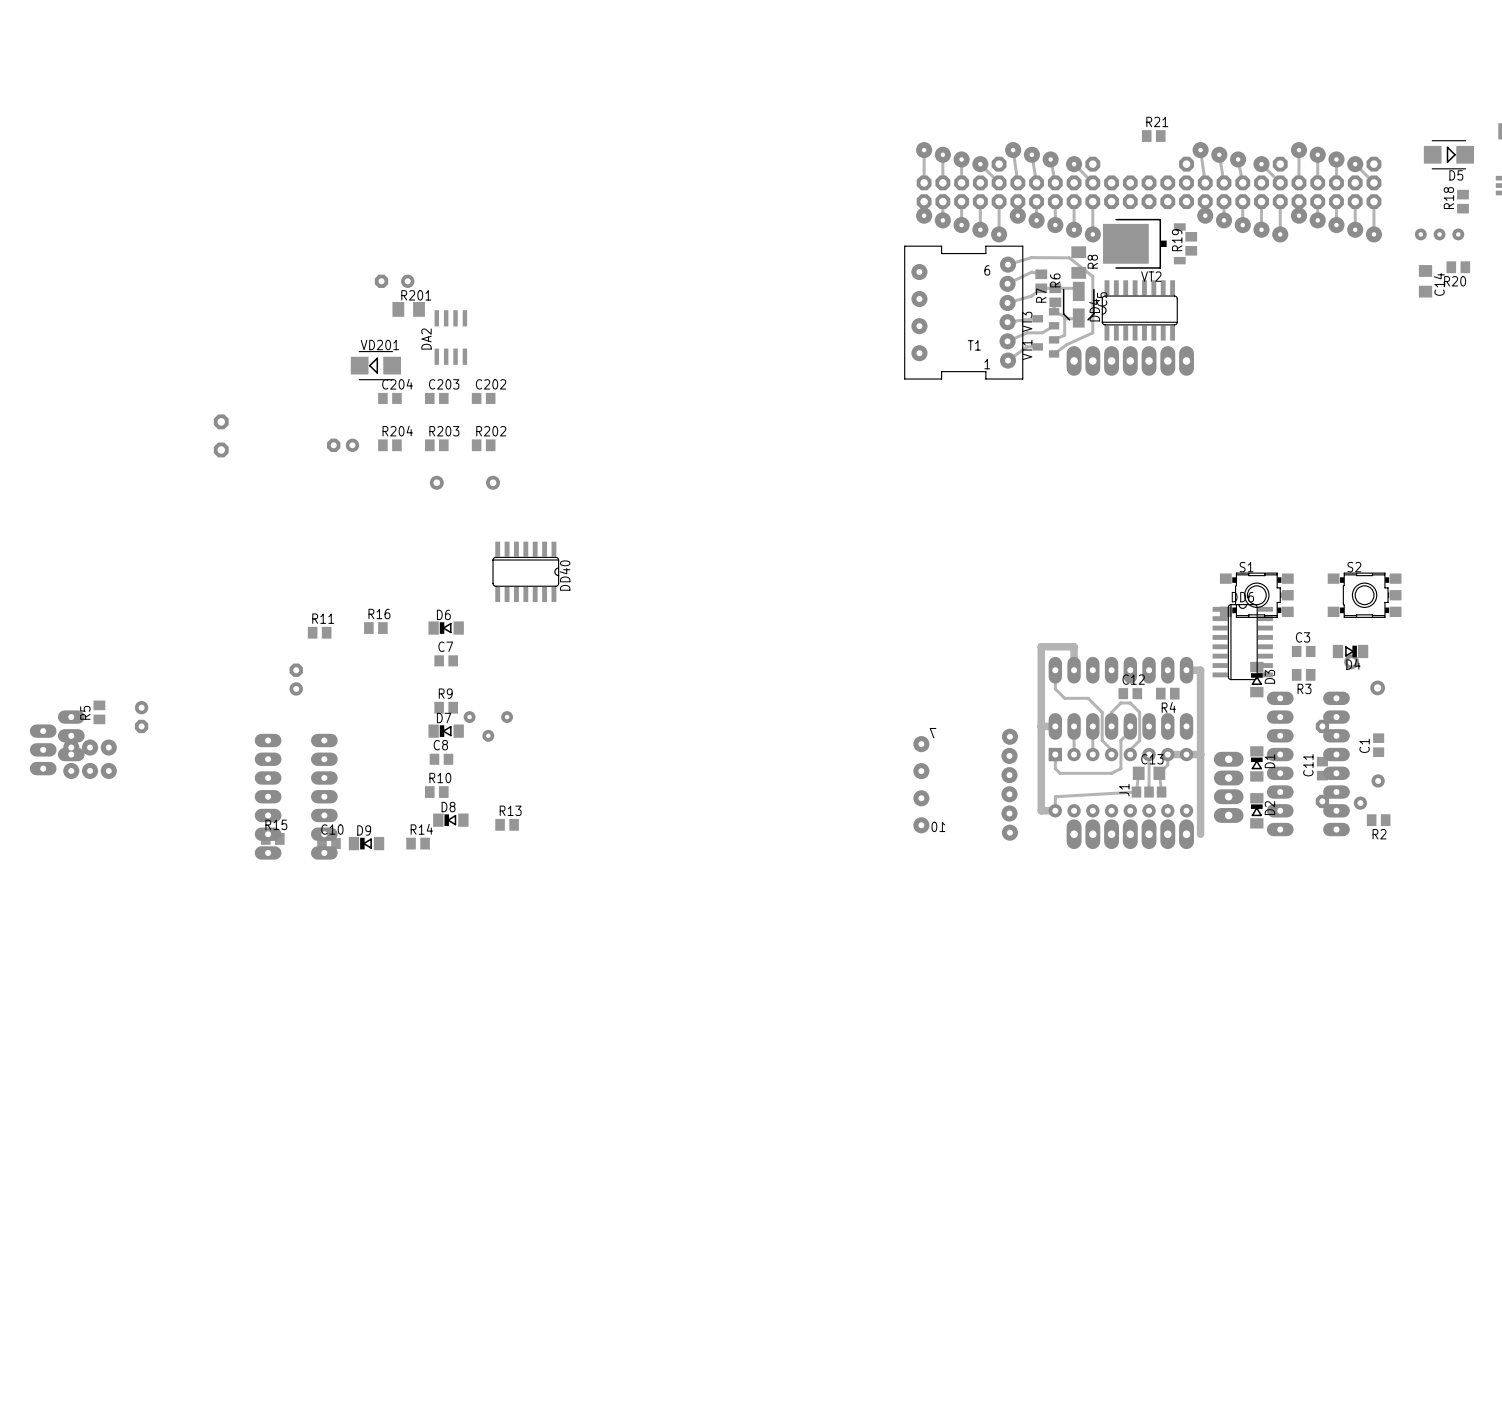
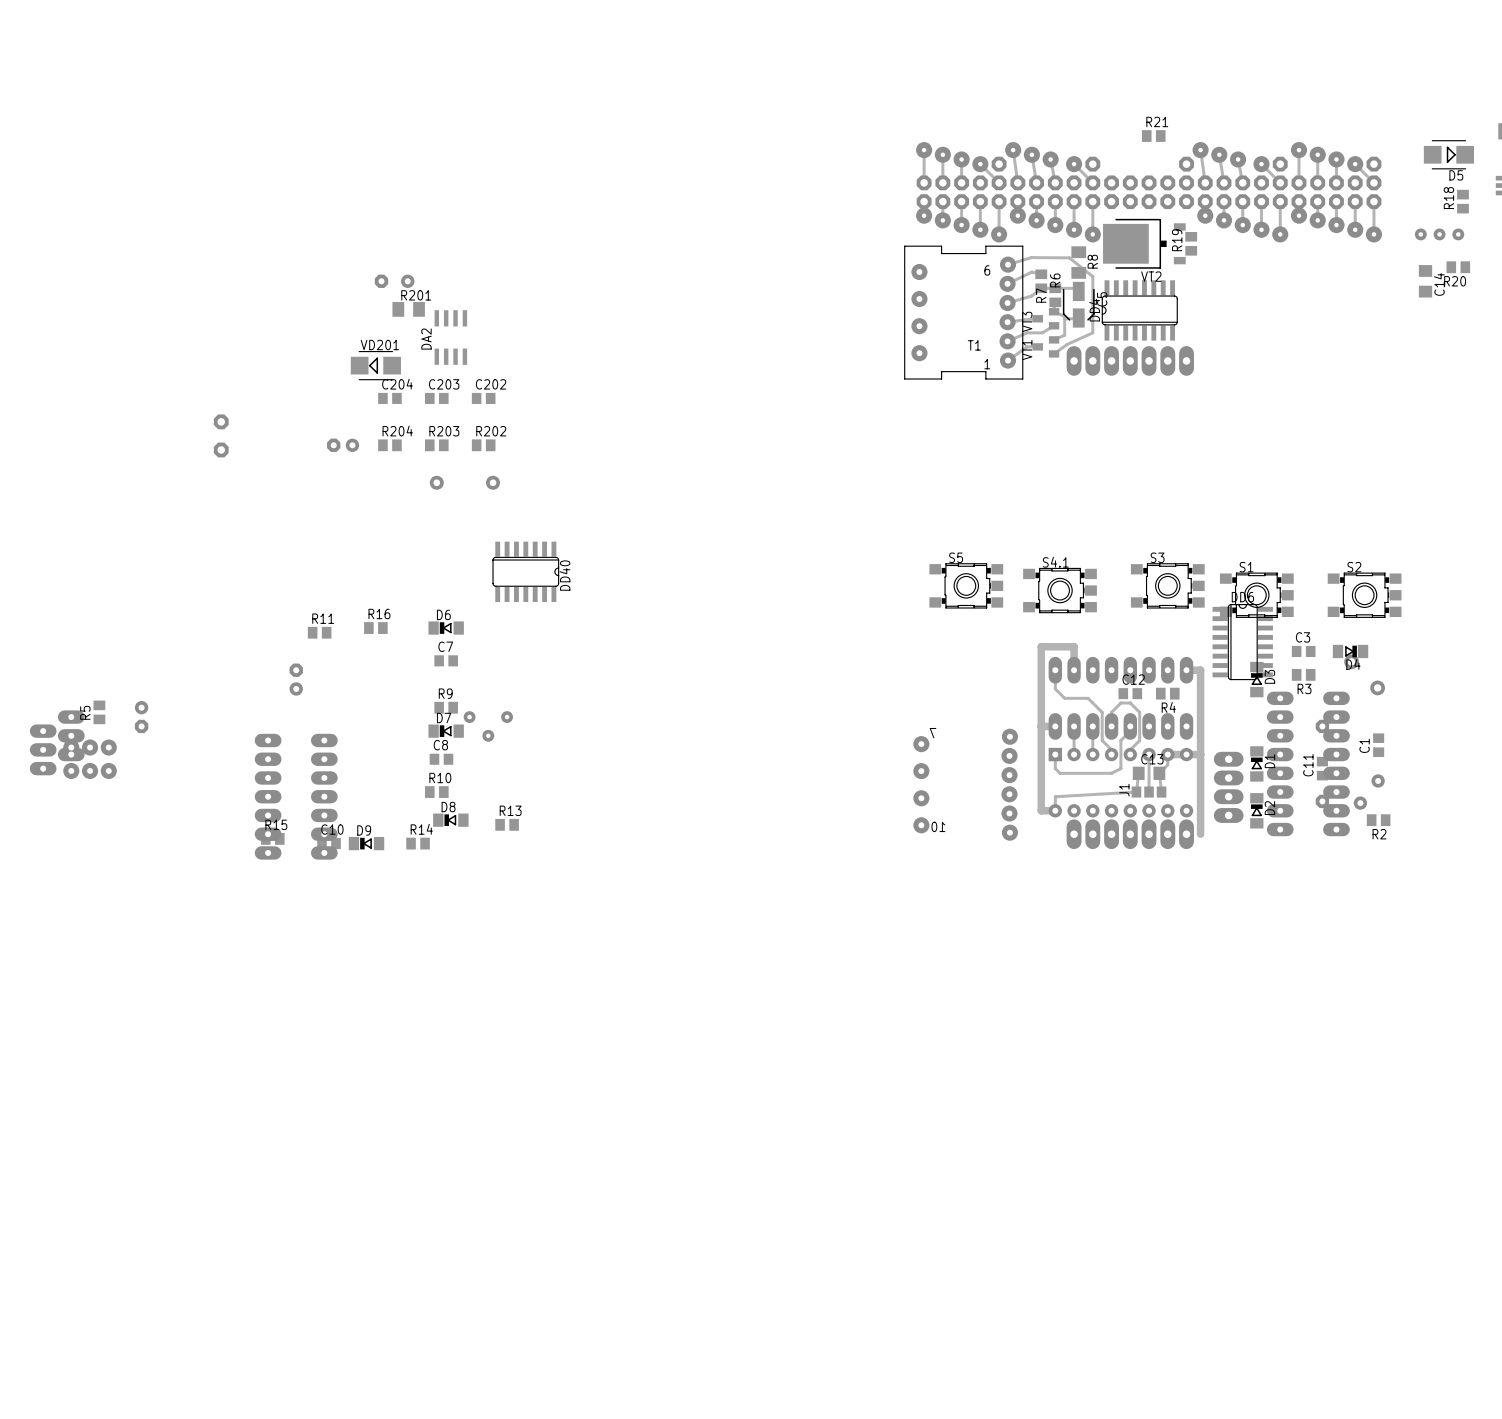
S5: none -> (966, 585)
S3: none -> (1167, 585)
S4.1: none -> (1060, 590)

